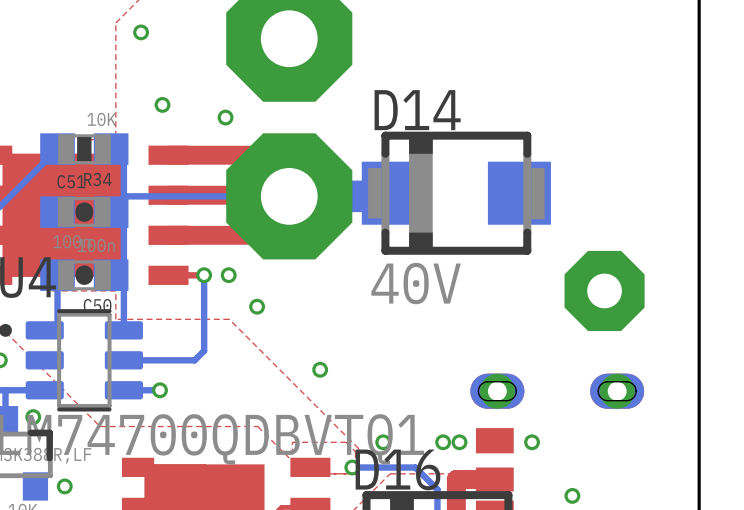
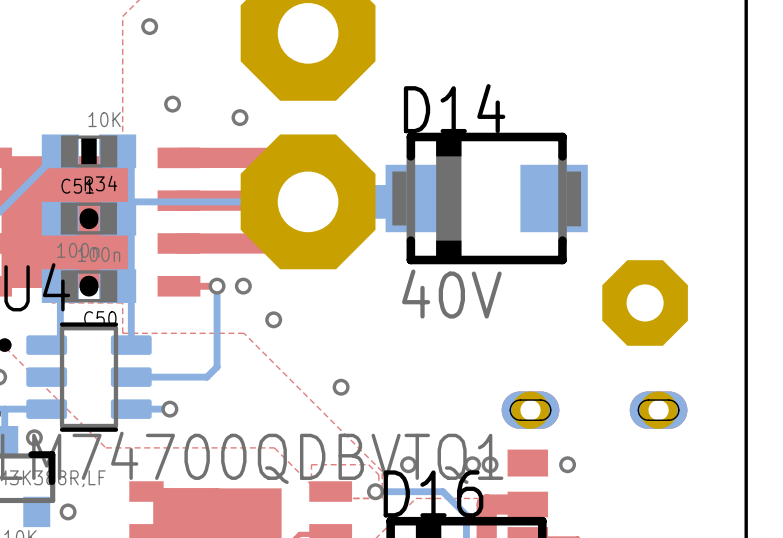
via: (572, 495) -> none

